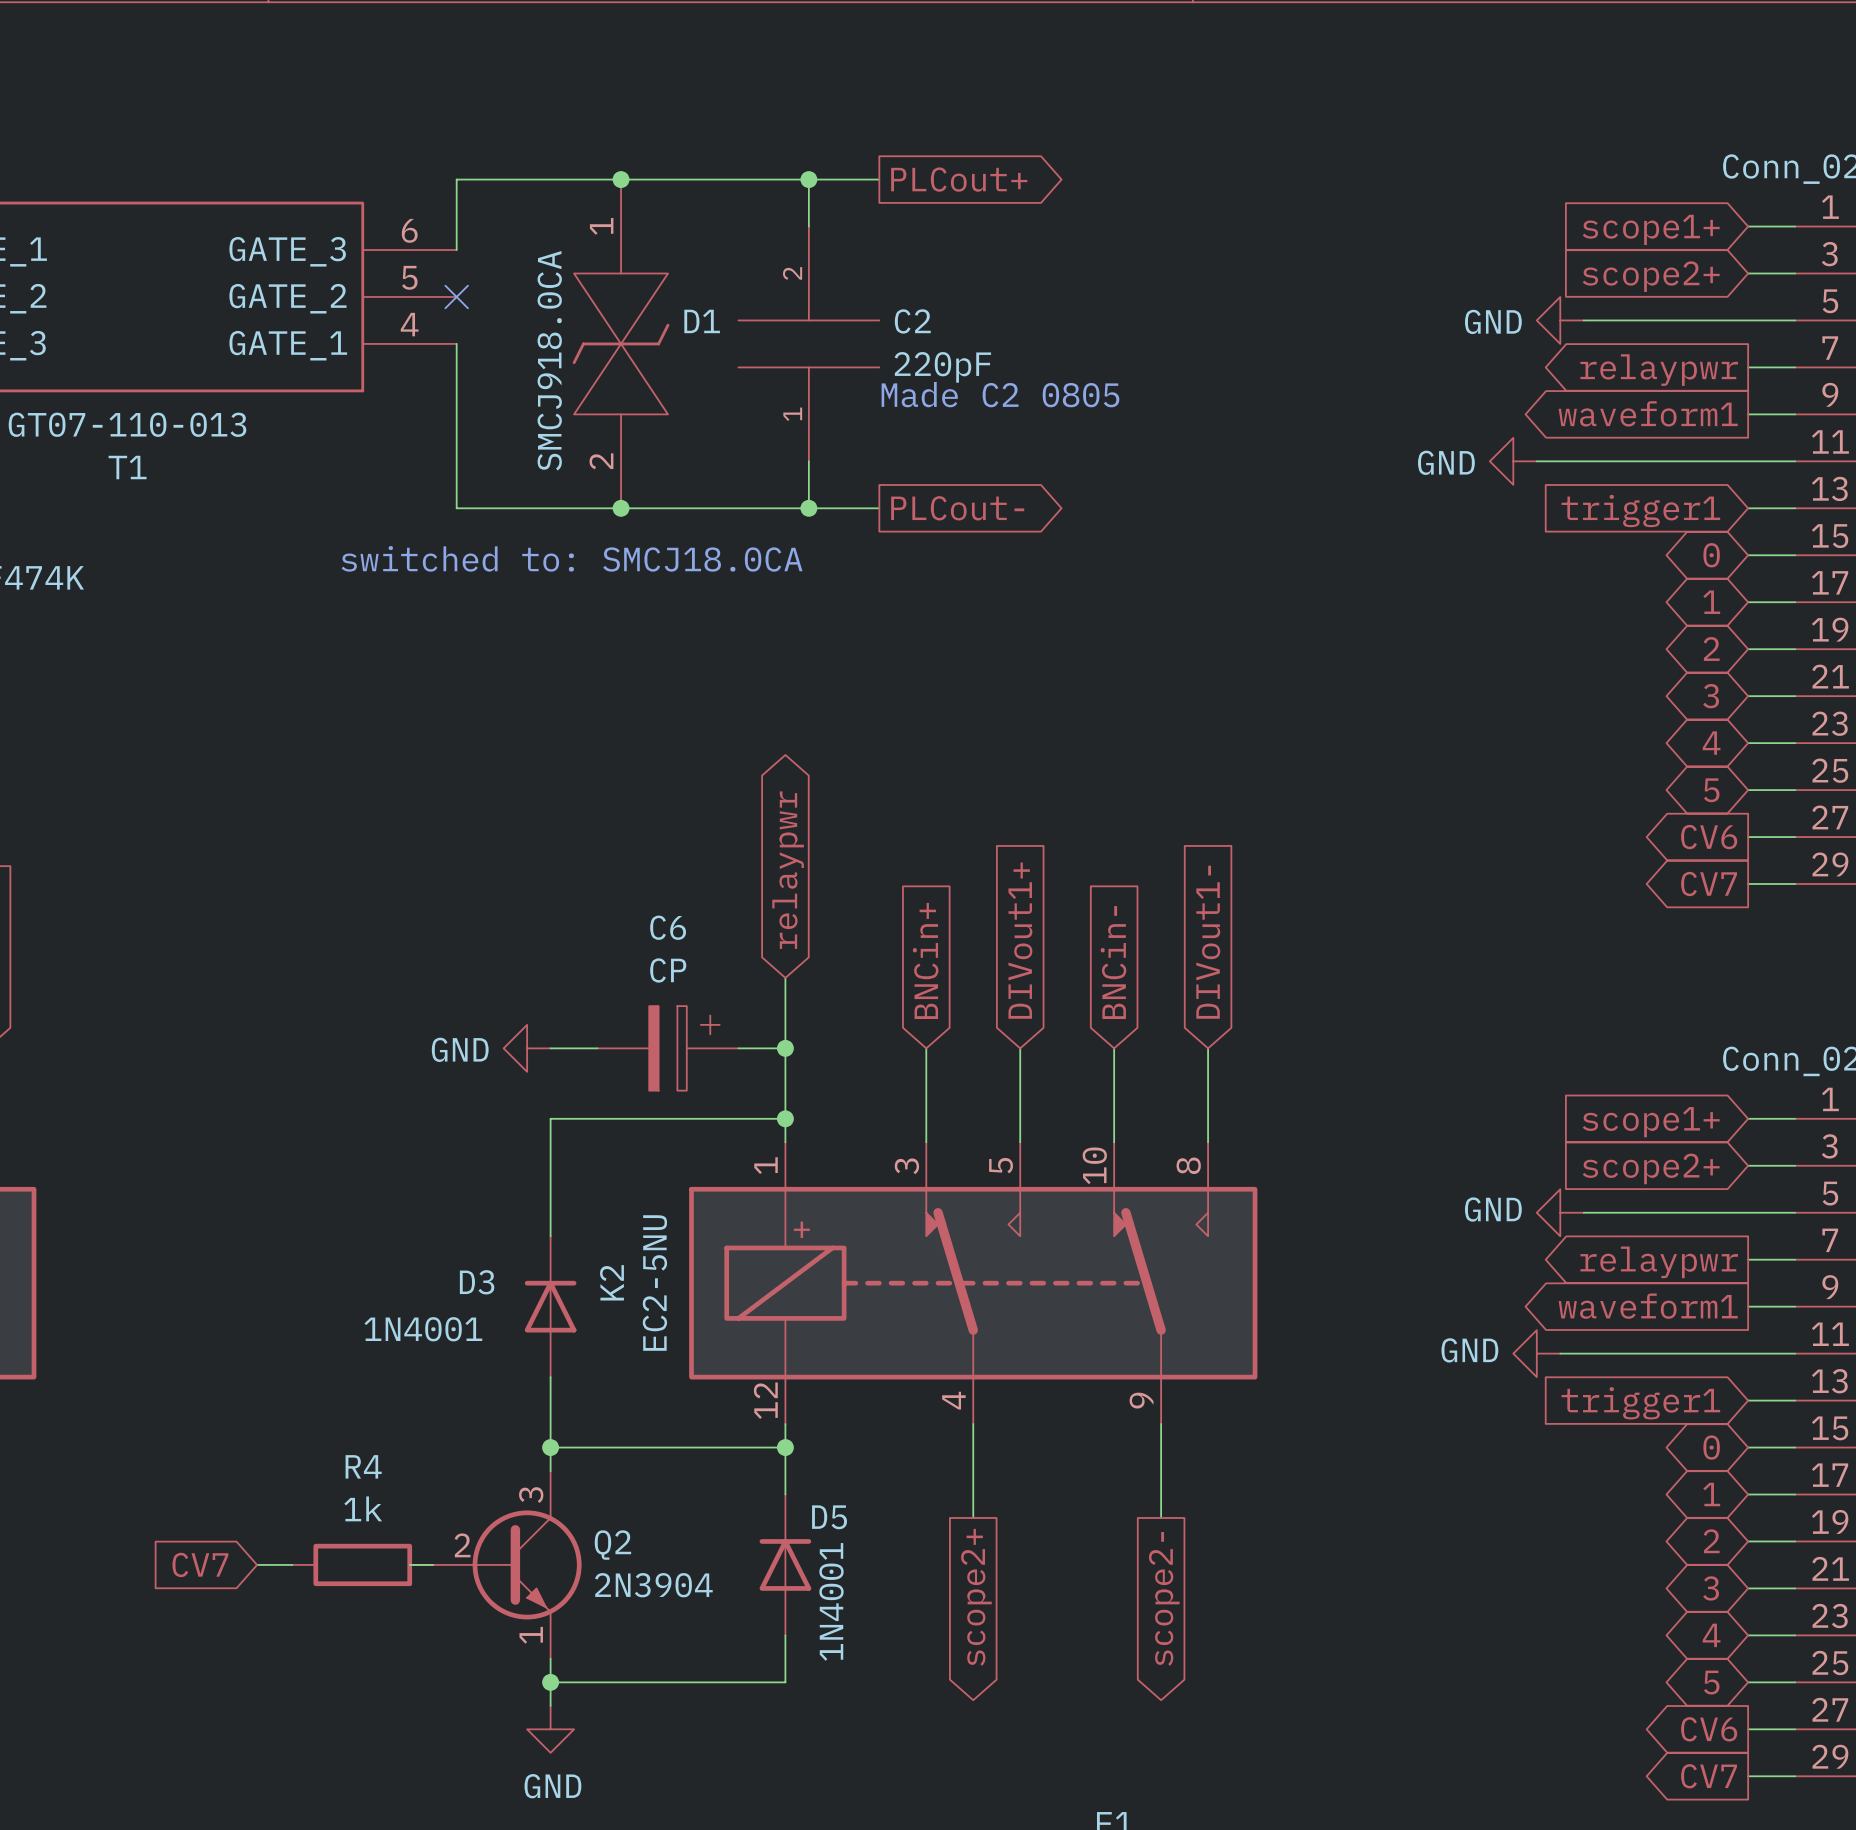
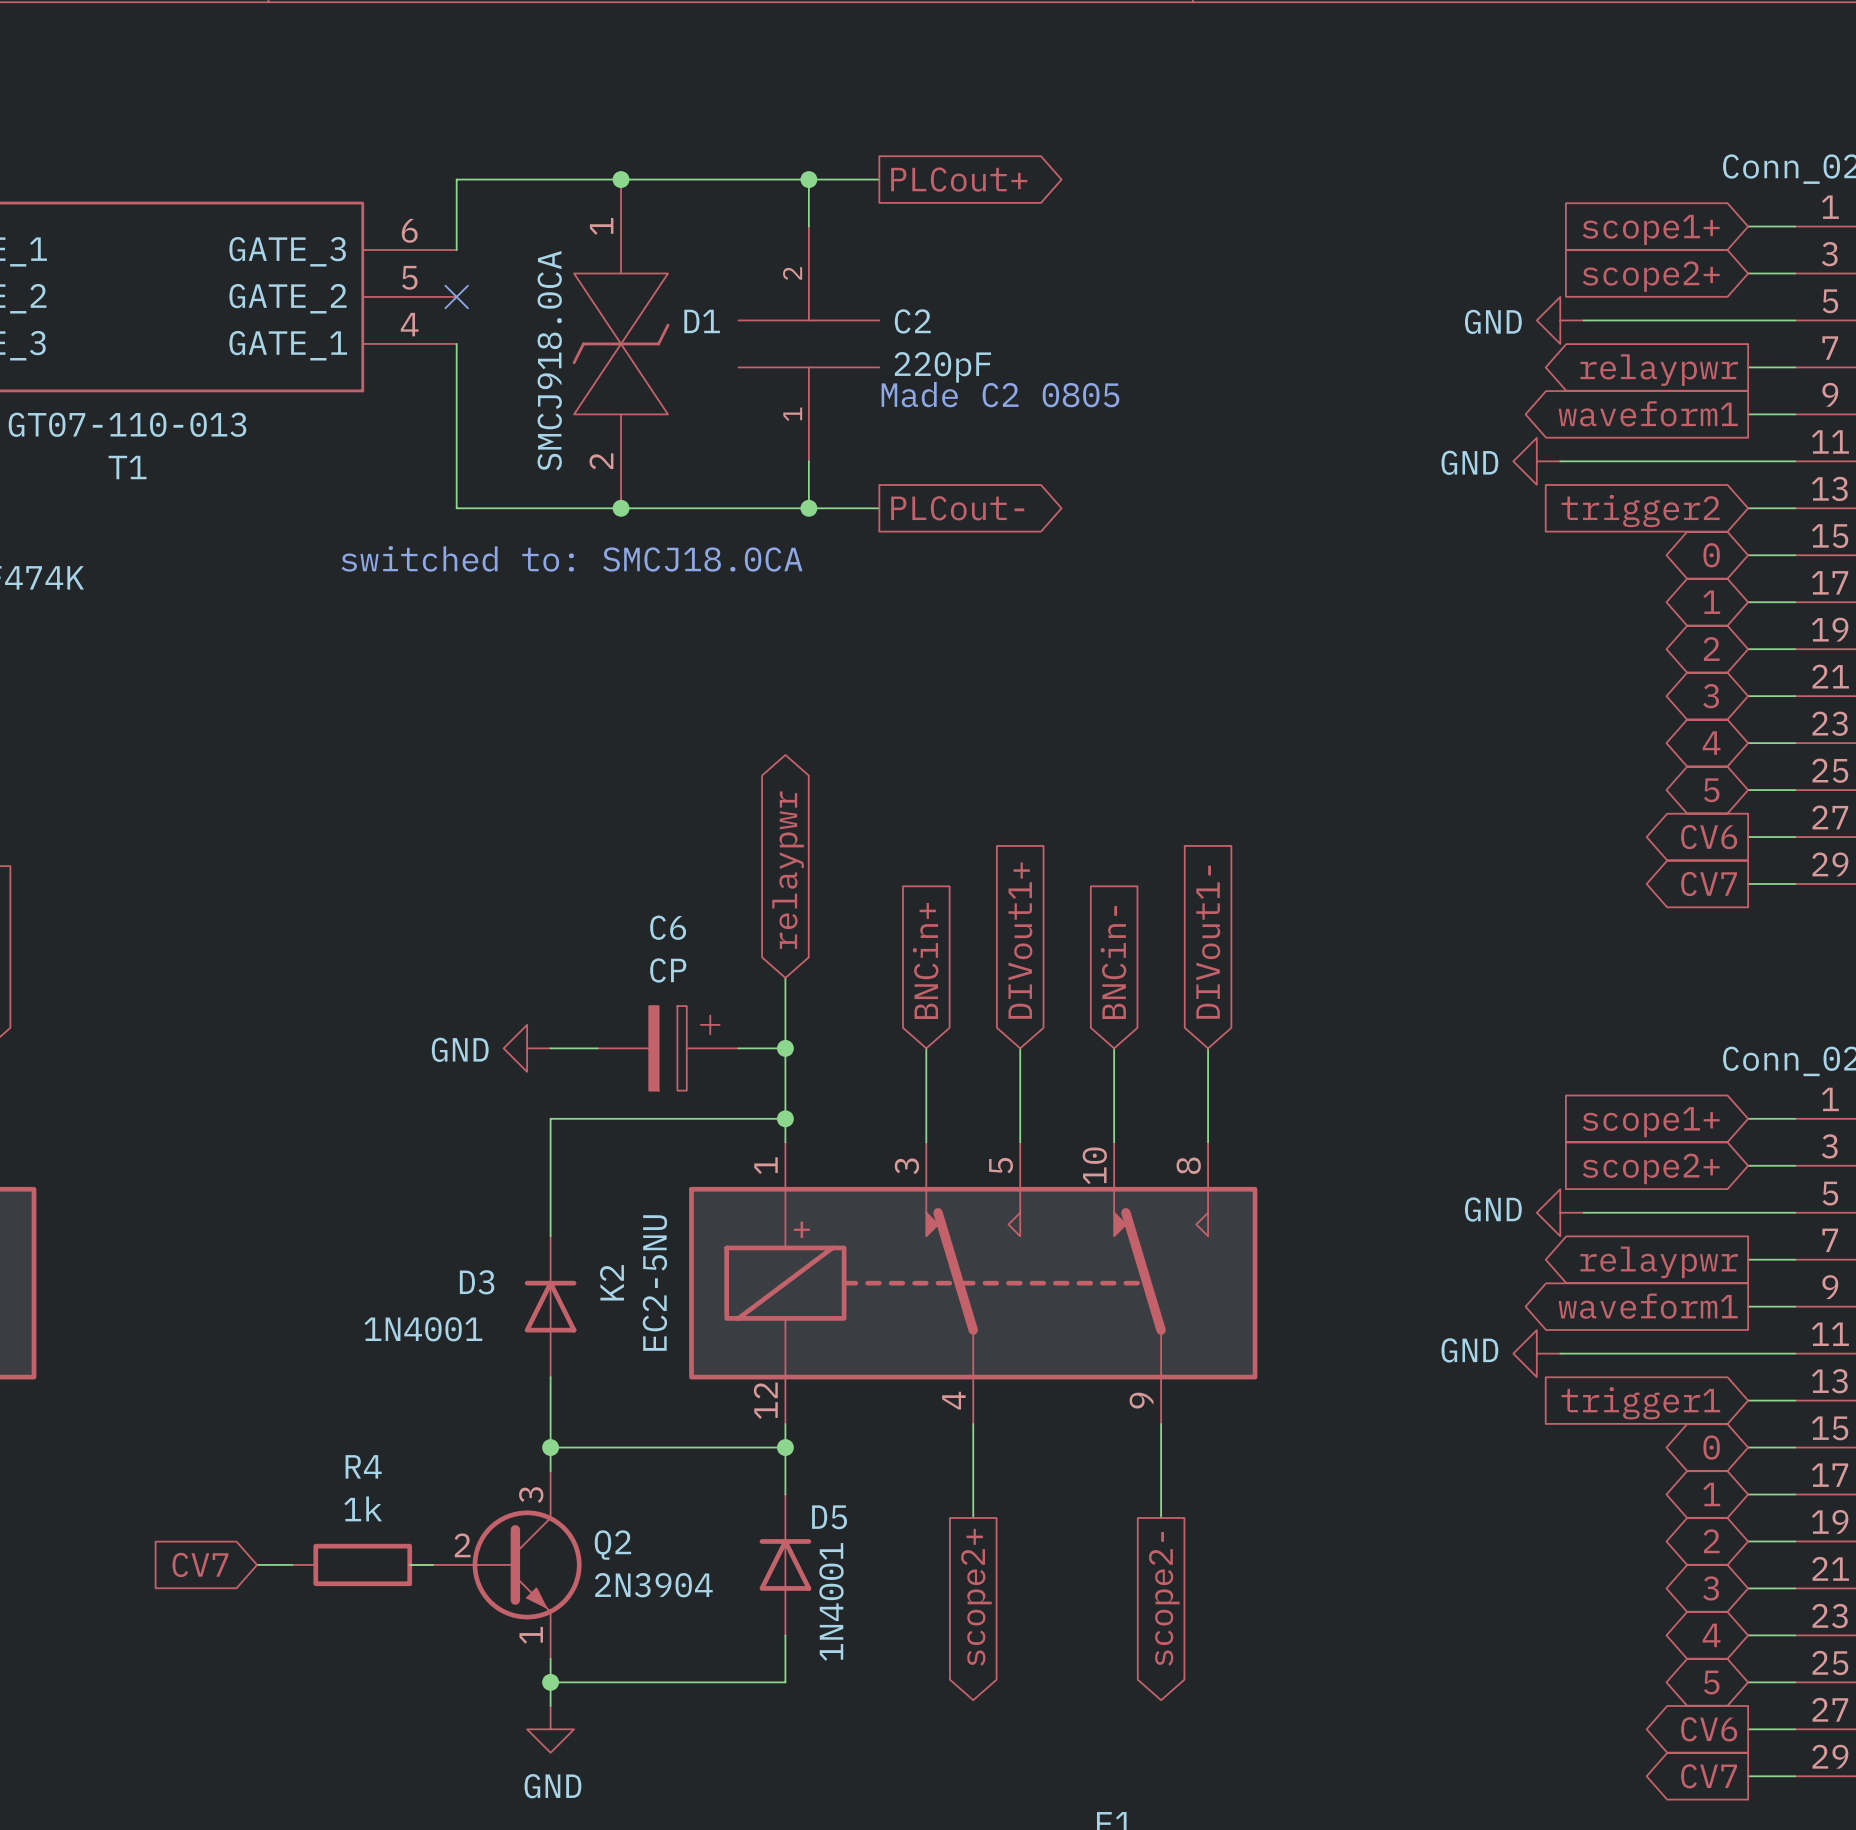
power symbol position: GND (1513, 461) -> GND (1536, 461)
global label: trigger1 (1640, 511) -> trigger2 (1640, 511)

